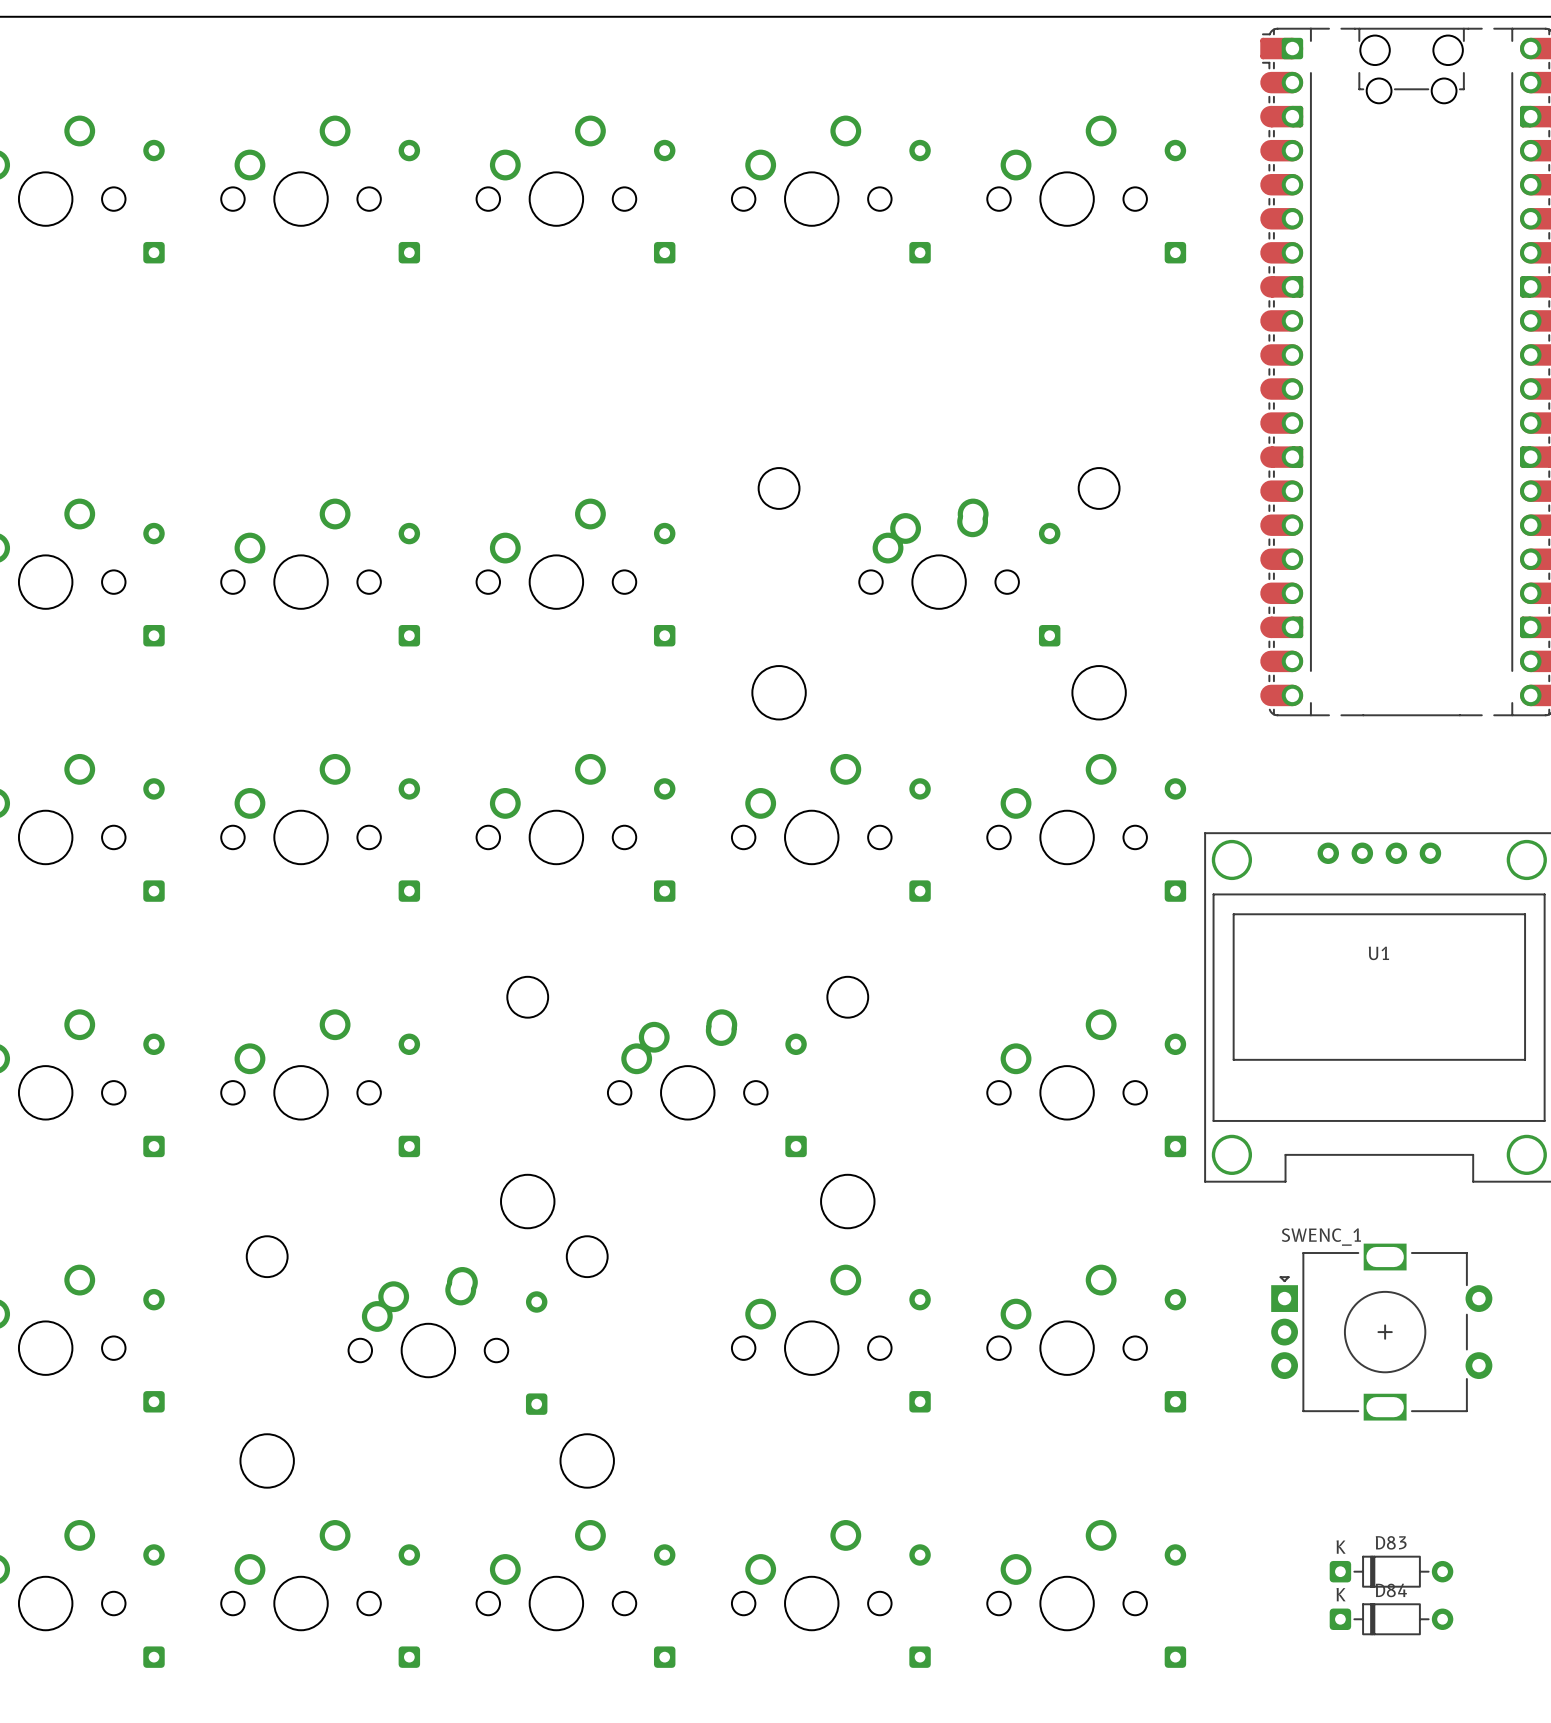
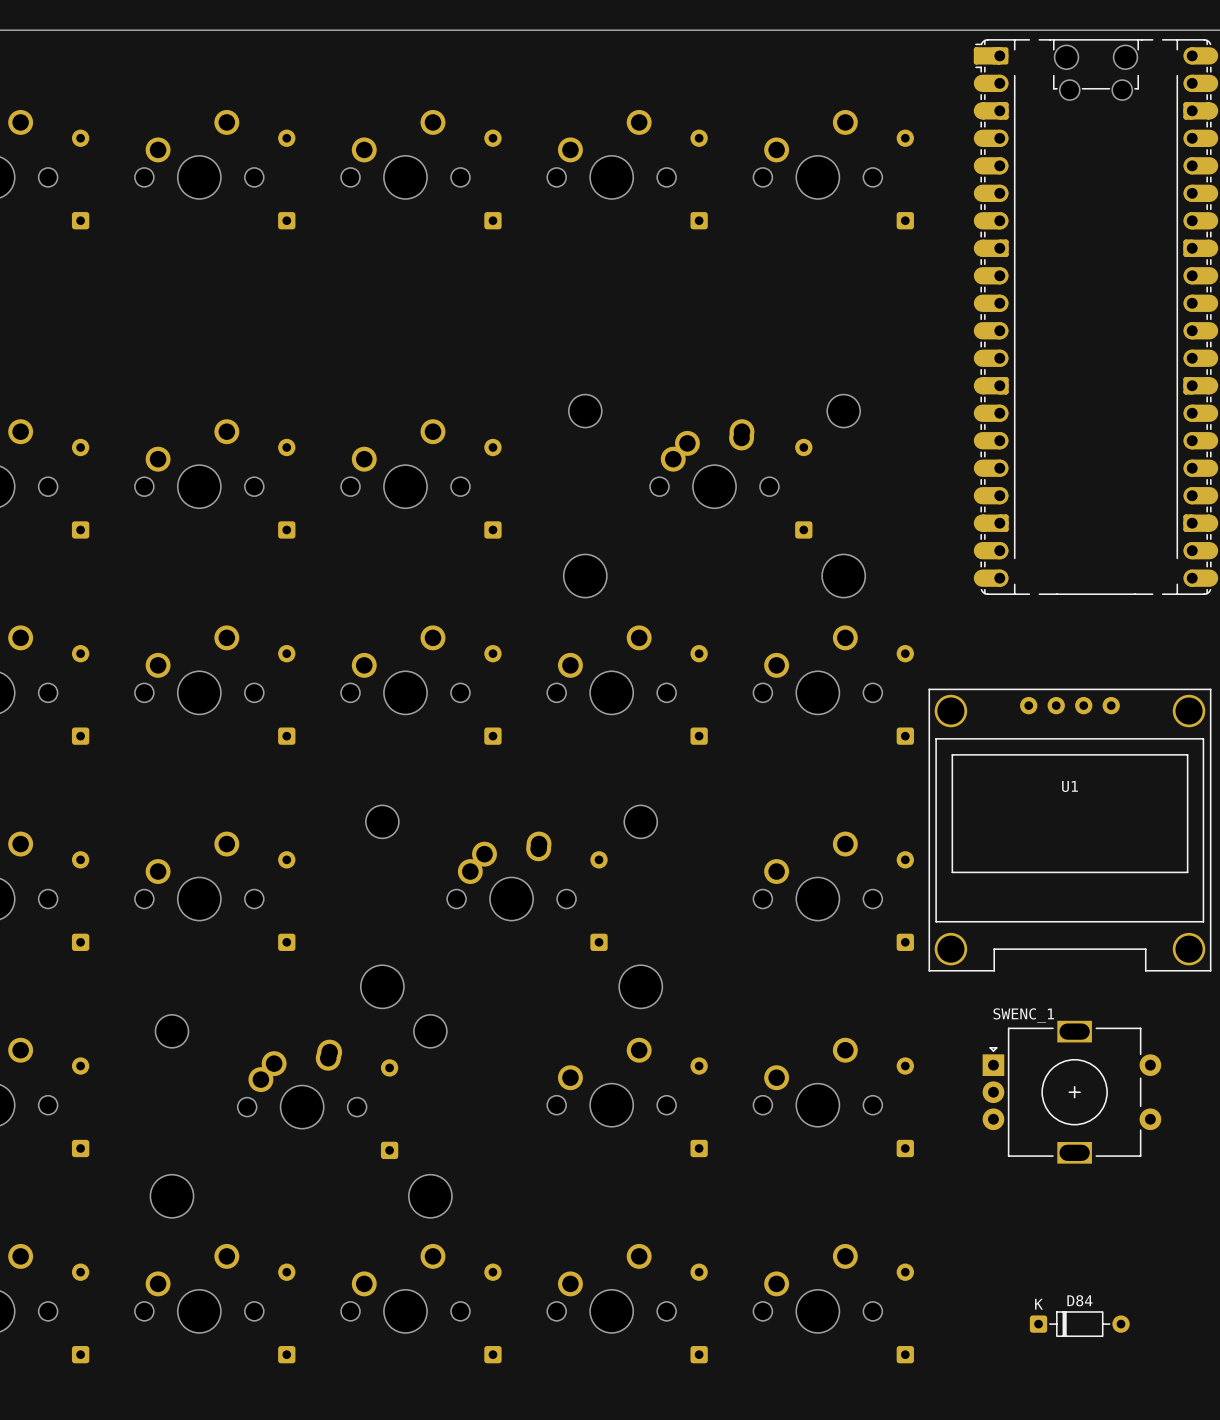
D83: (1391, 1571) -> none

